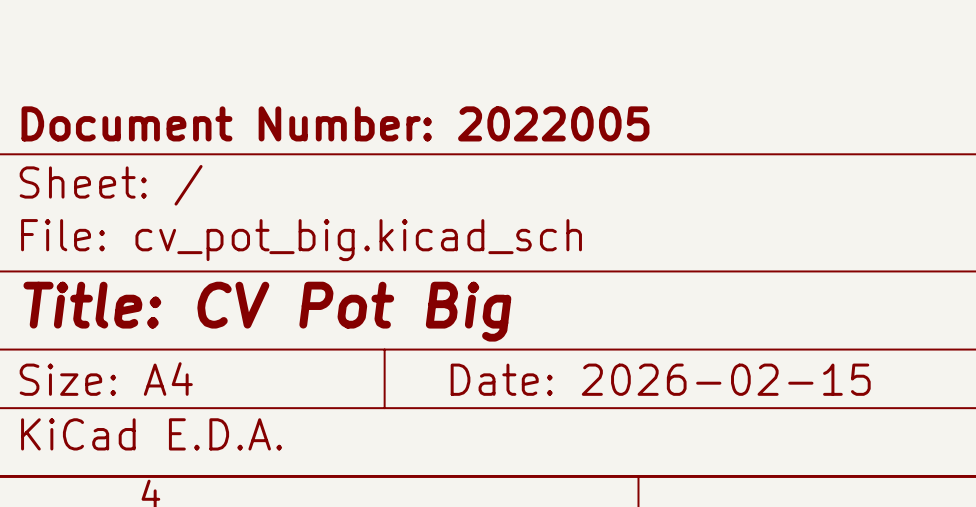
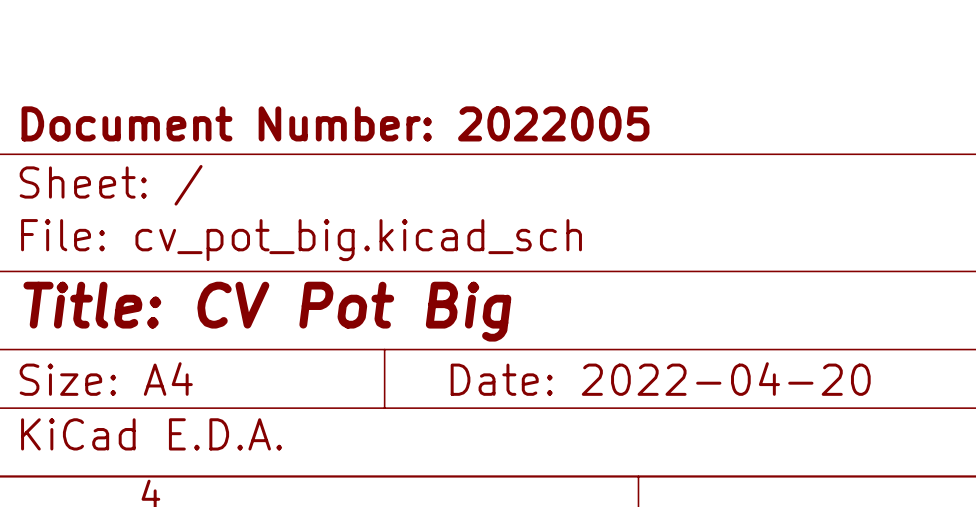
title block: Date: 2026-02-15 (660, 379) -> Date: 2022-04-20 (660, 379)

